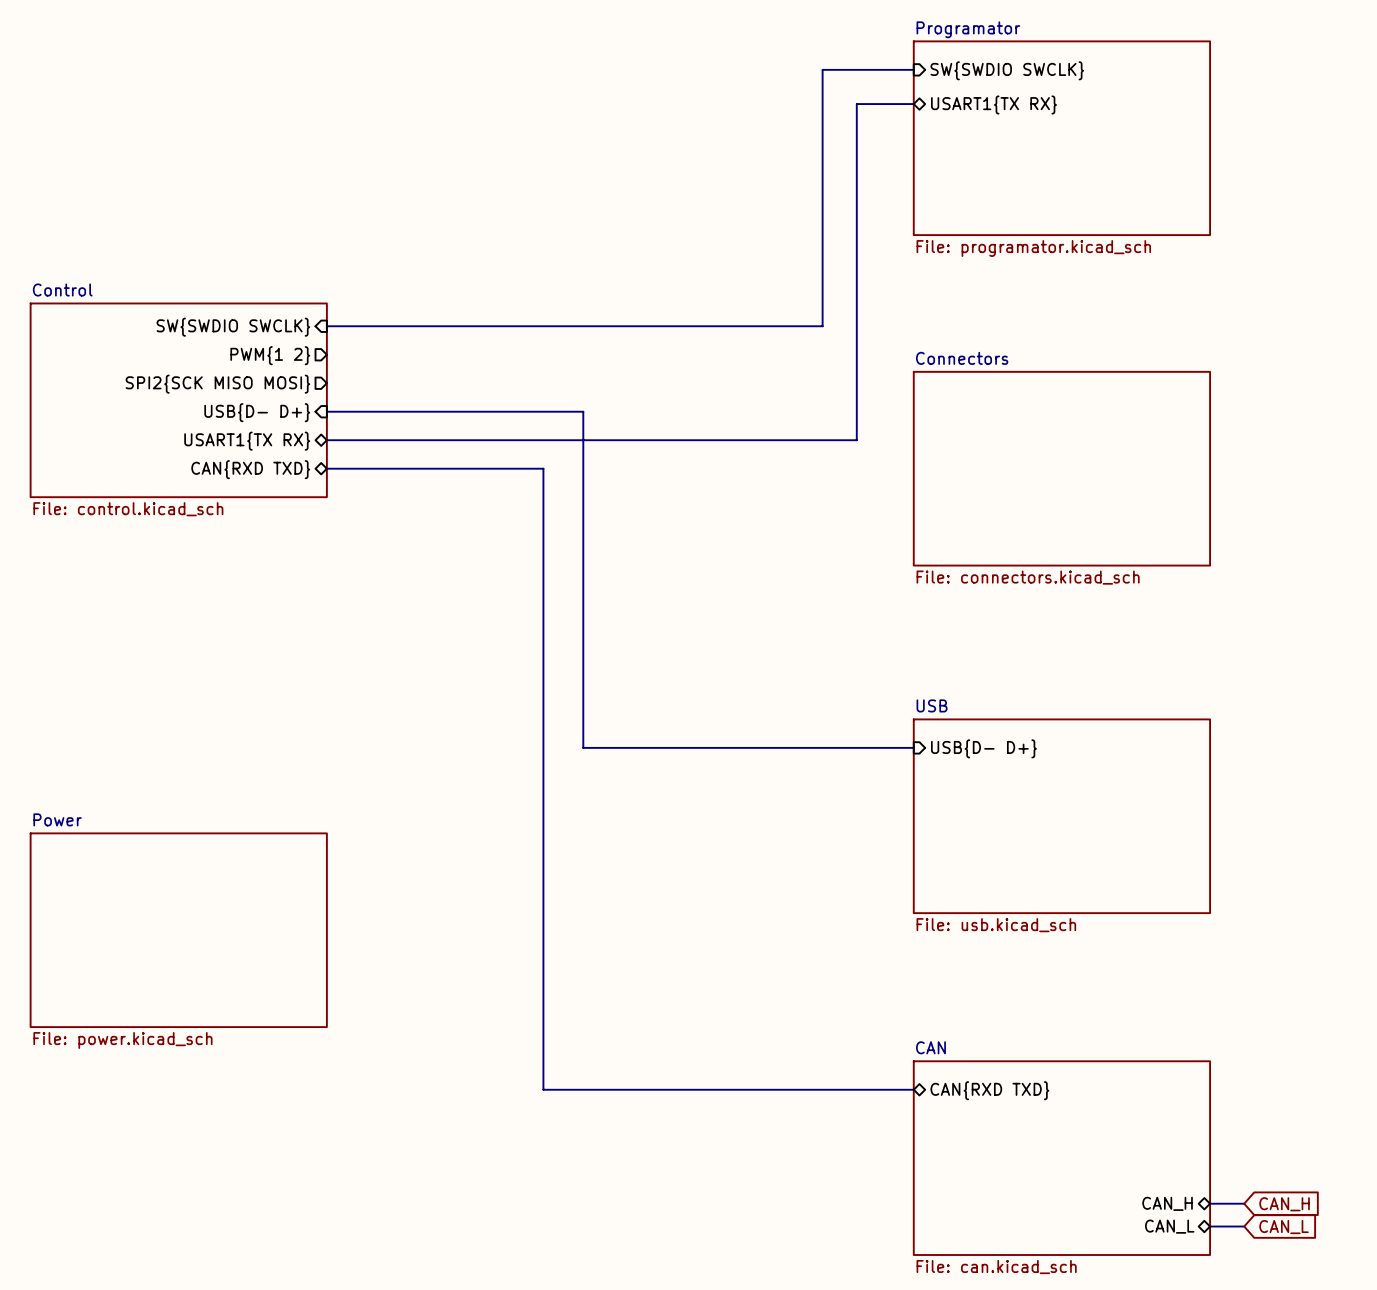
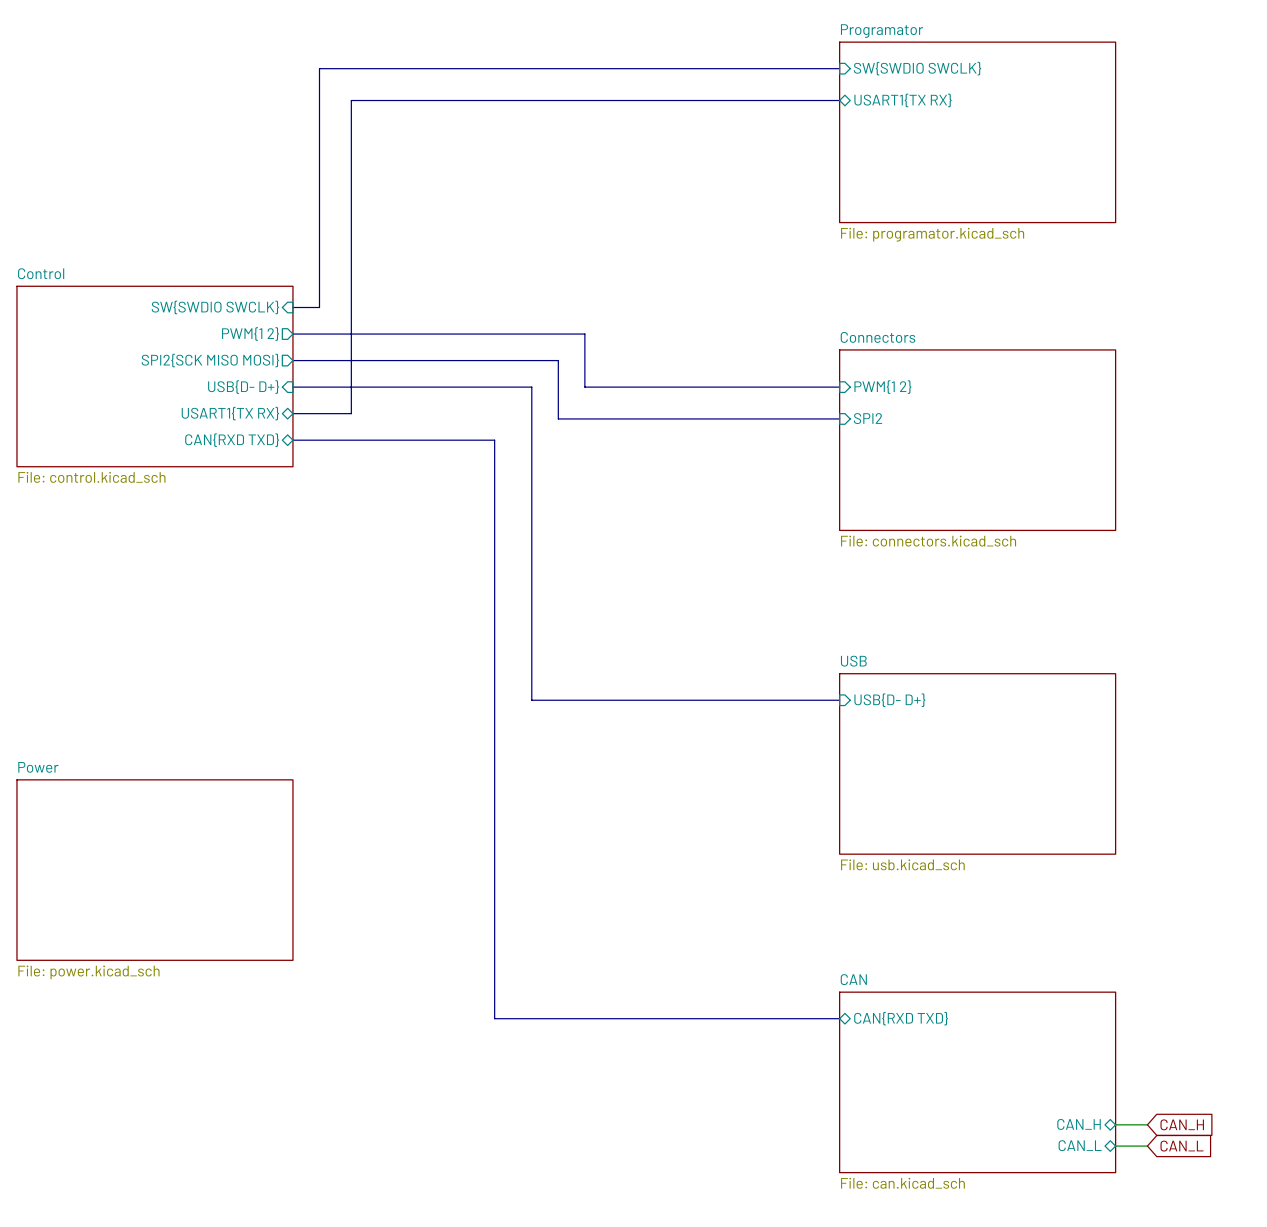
bus: (822, 69) (822, 326) (355, 326) -> (754, 68) (319, 68) (319, 307)
bus: (856, 104) (856, 440) (389, 440) -> (786, 100) (351, 100) (351, 413)
bus: none -> (292, 334) (584, 334) (584, 387) (839, 387)
bus: none -> (292, 360) (558, 360) (558, 418) (839, 418)
sheet pin: none -> PWM{1 2} (882, 387)
sheet pin: none -> SPI2 (868, 418)

